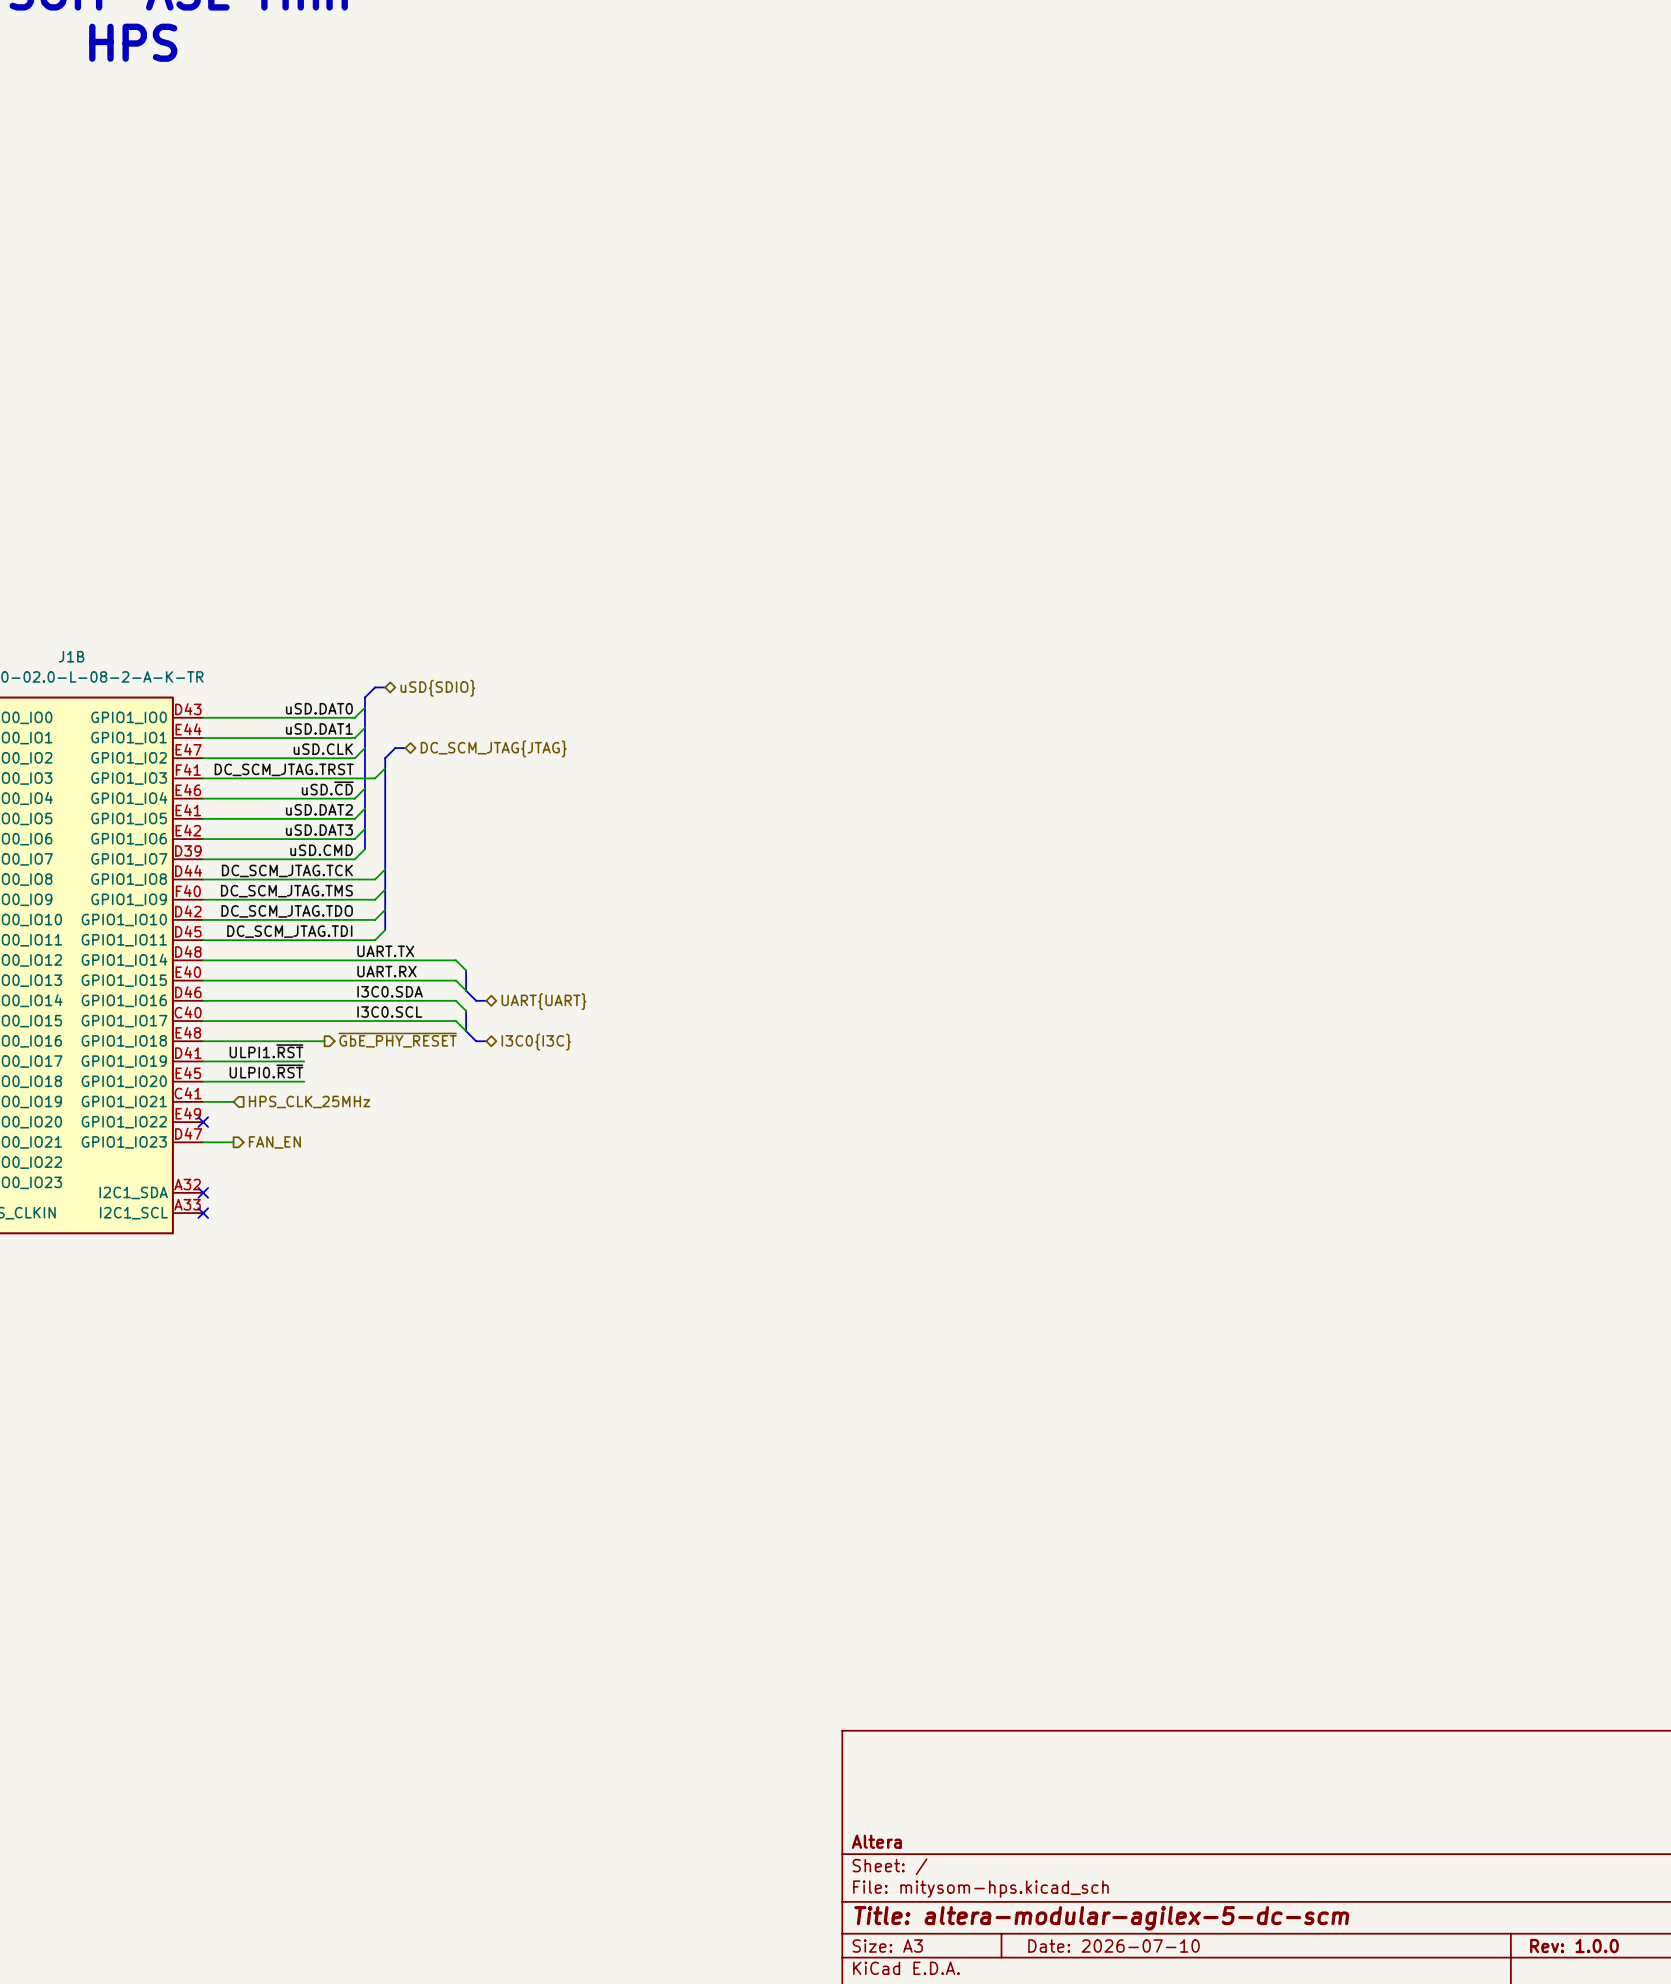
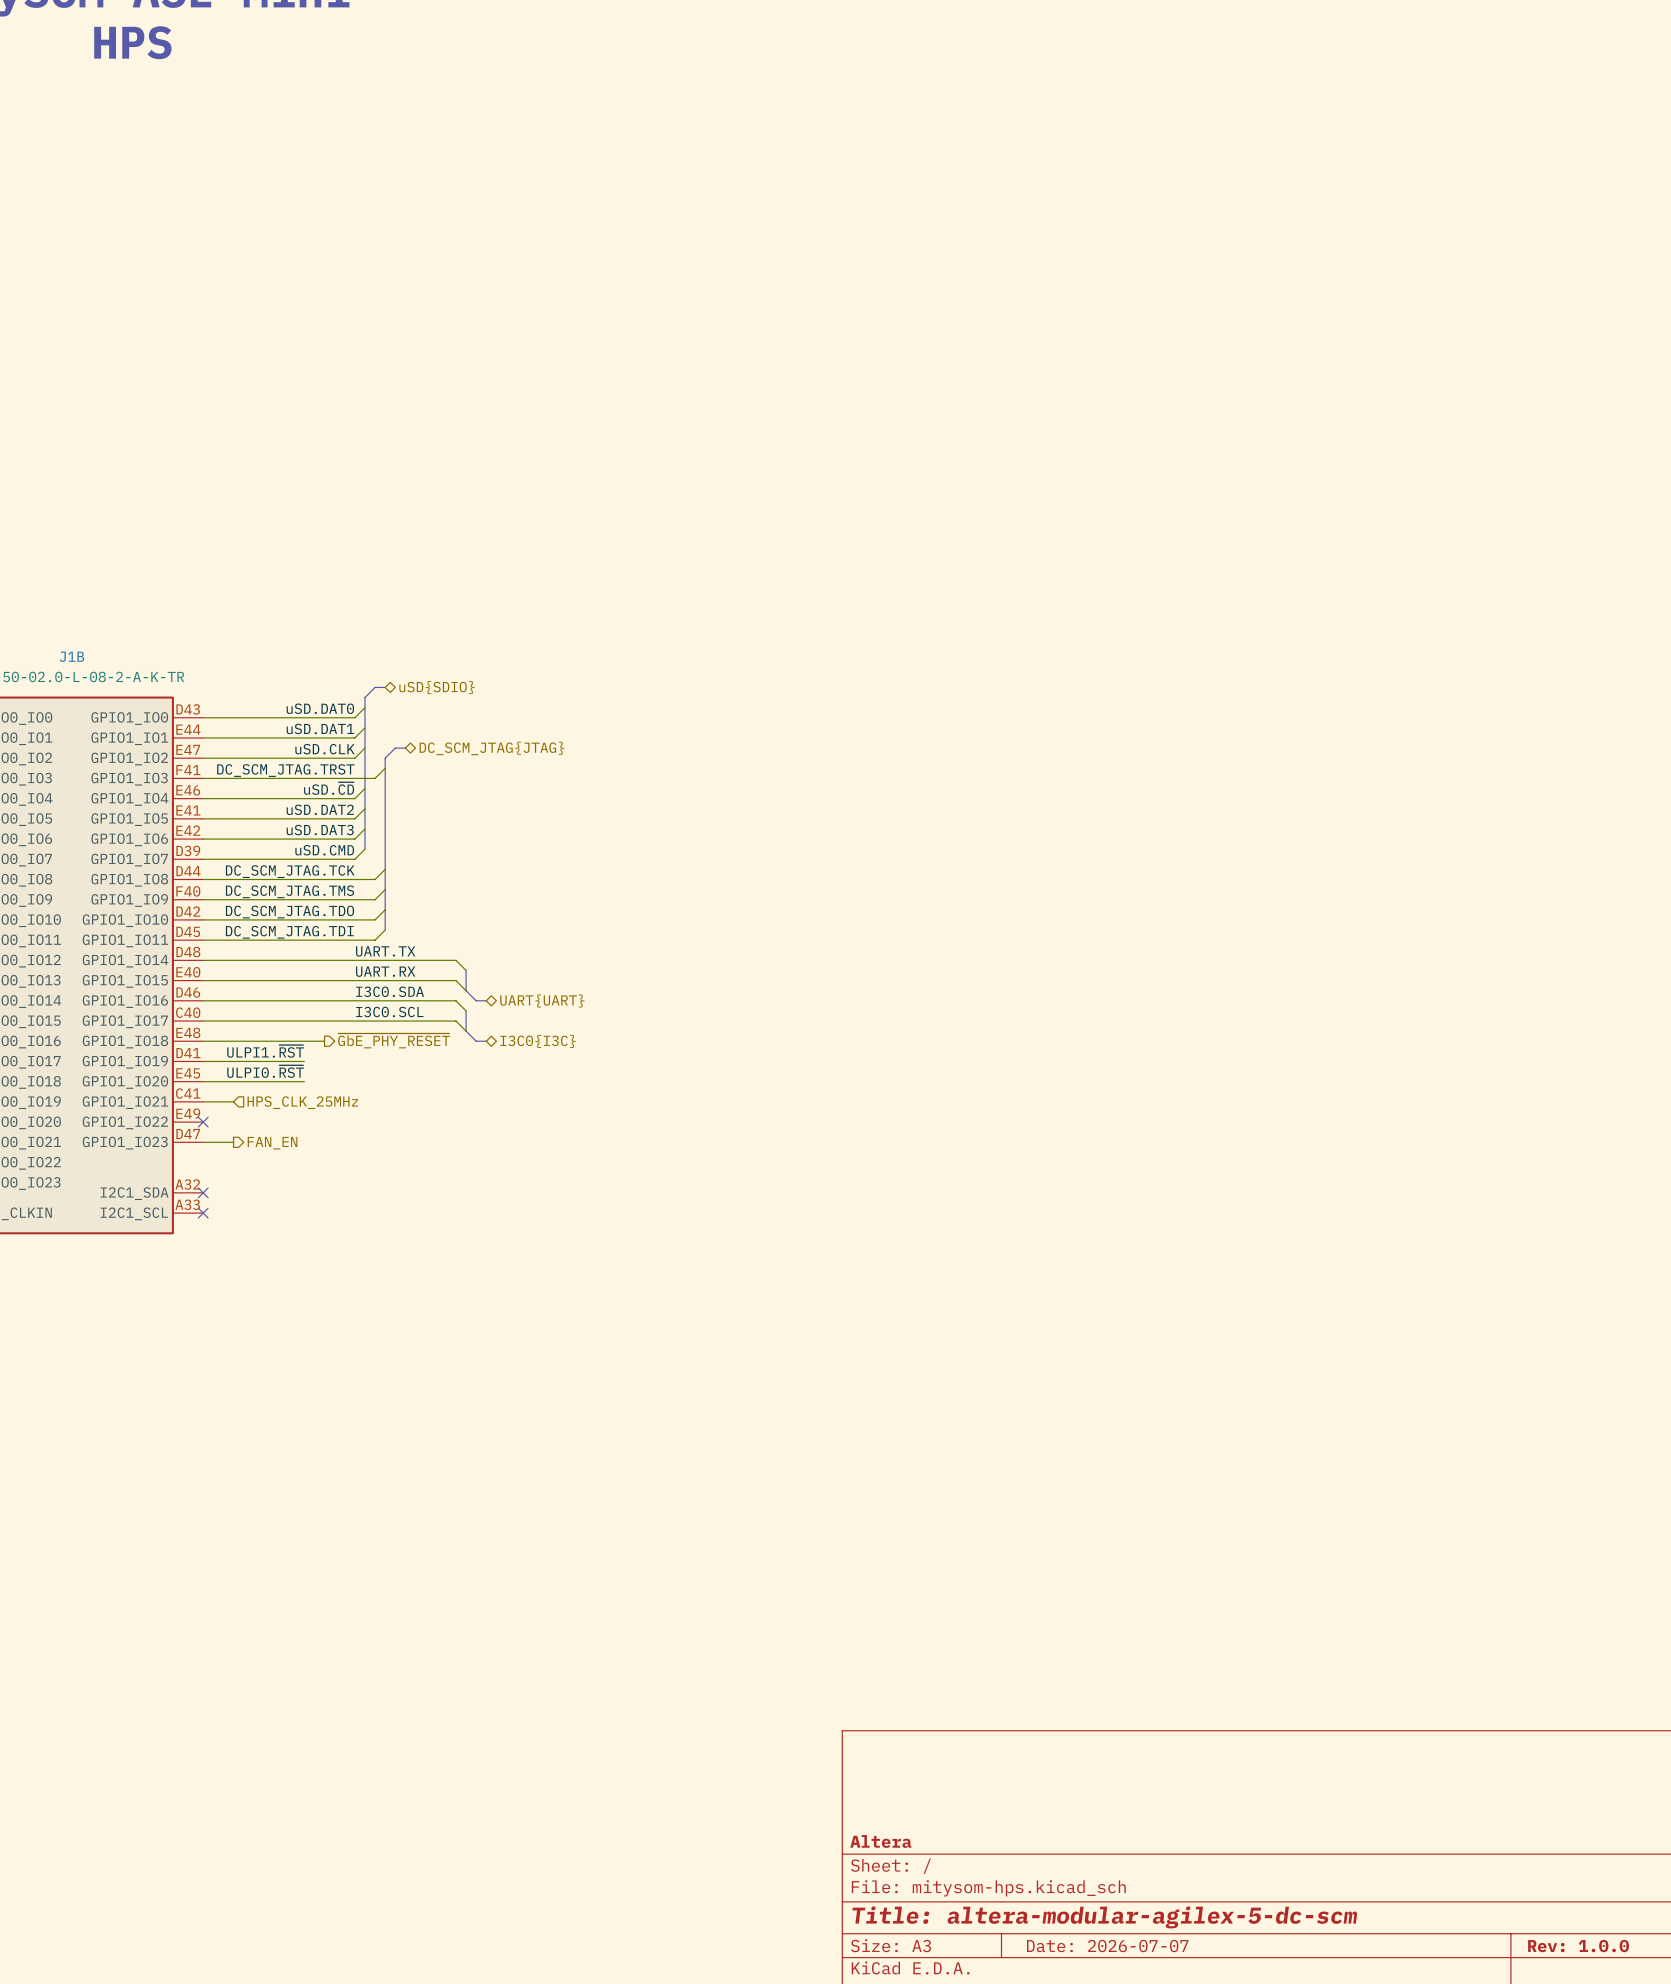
title block: Date: 2026-07-10 (1114, 1946) -> Date: 2026-07-07 (1107, 1946)

